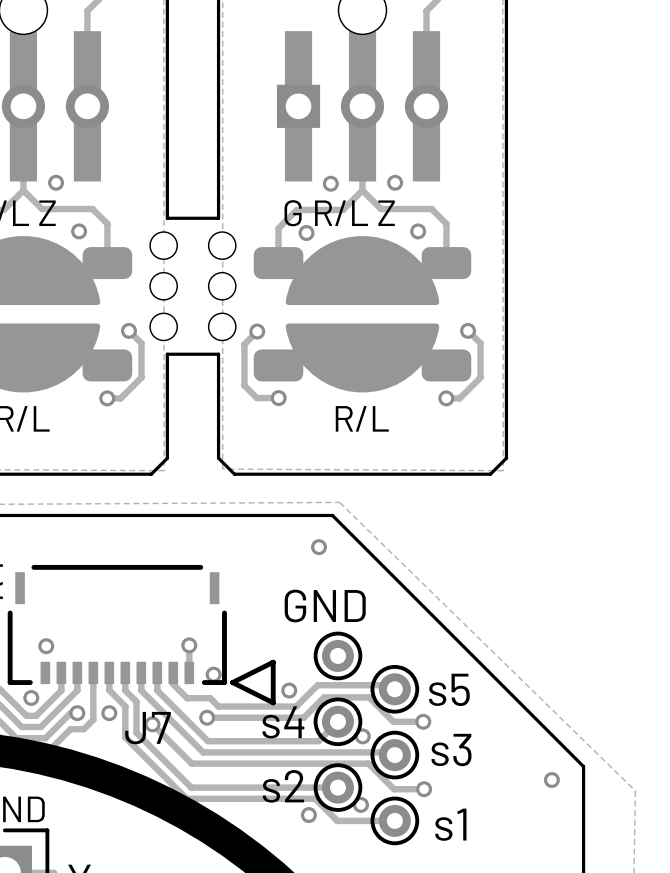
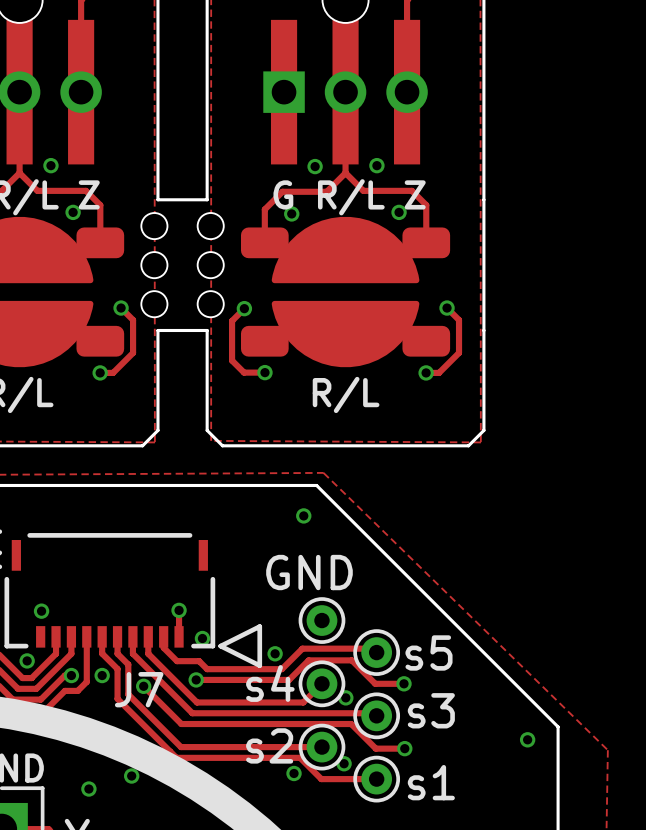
via: none -> (131, 776)
via: none -> (88, 789)

